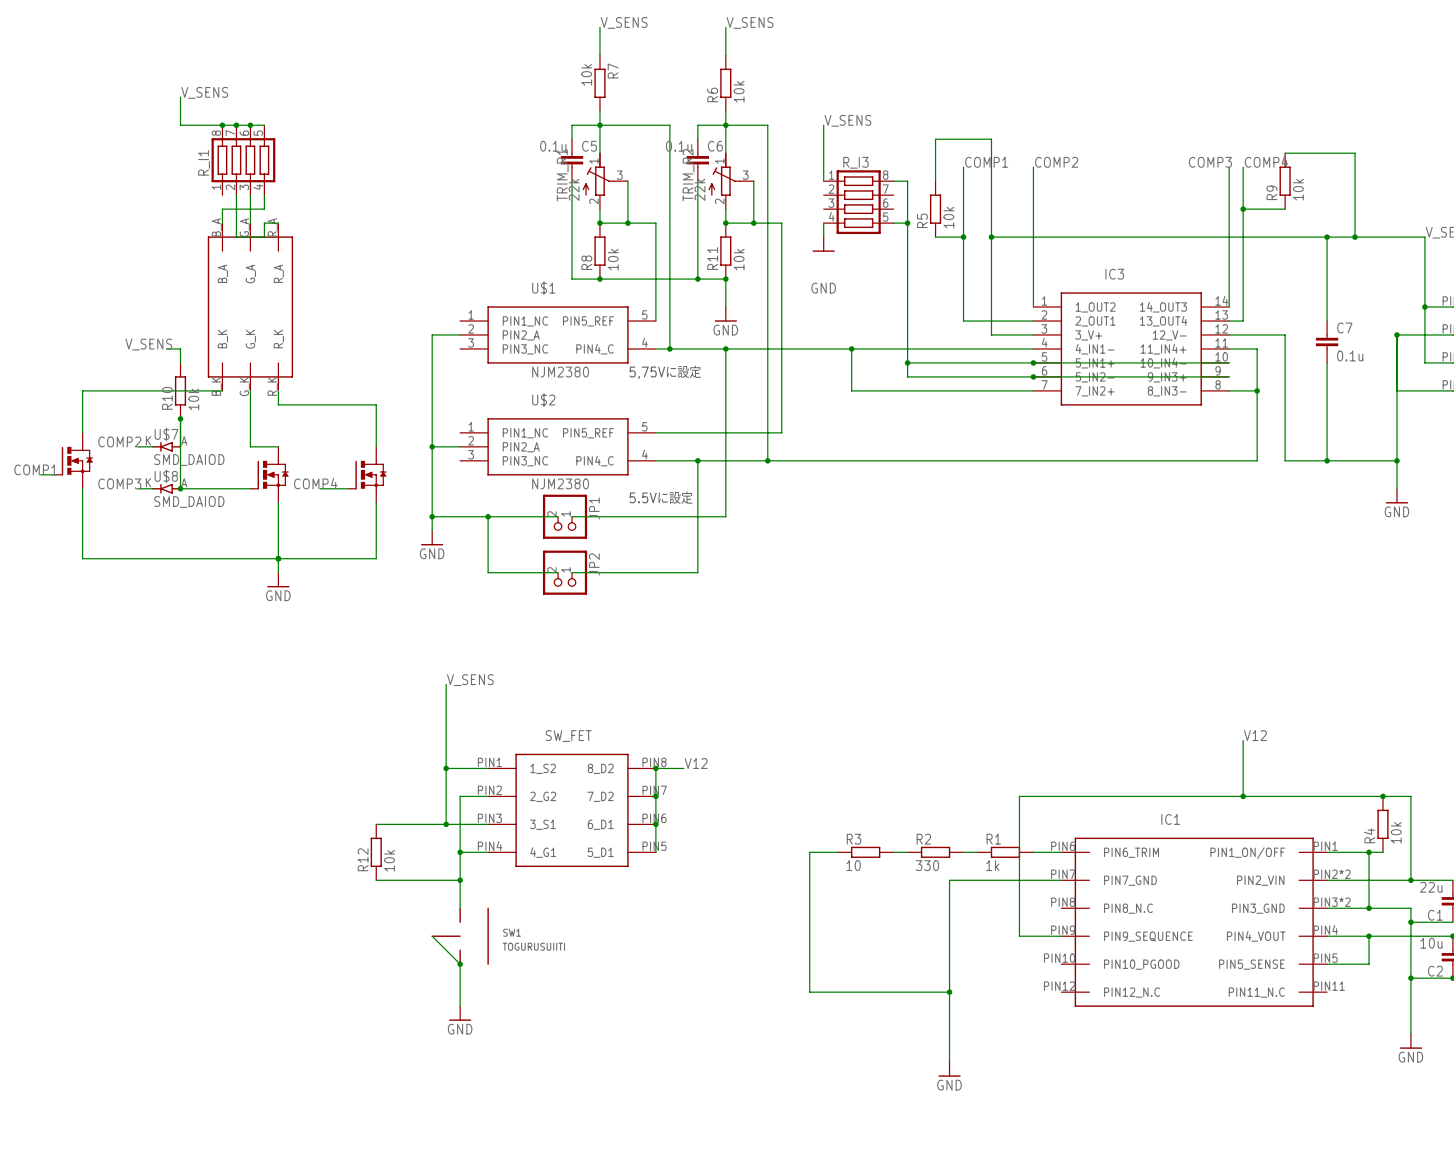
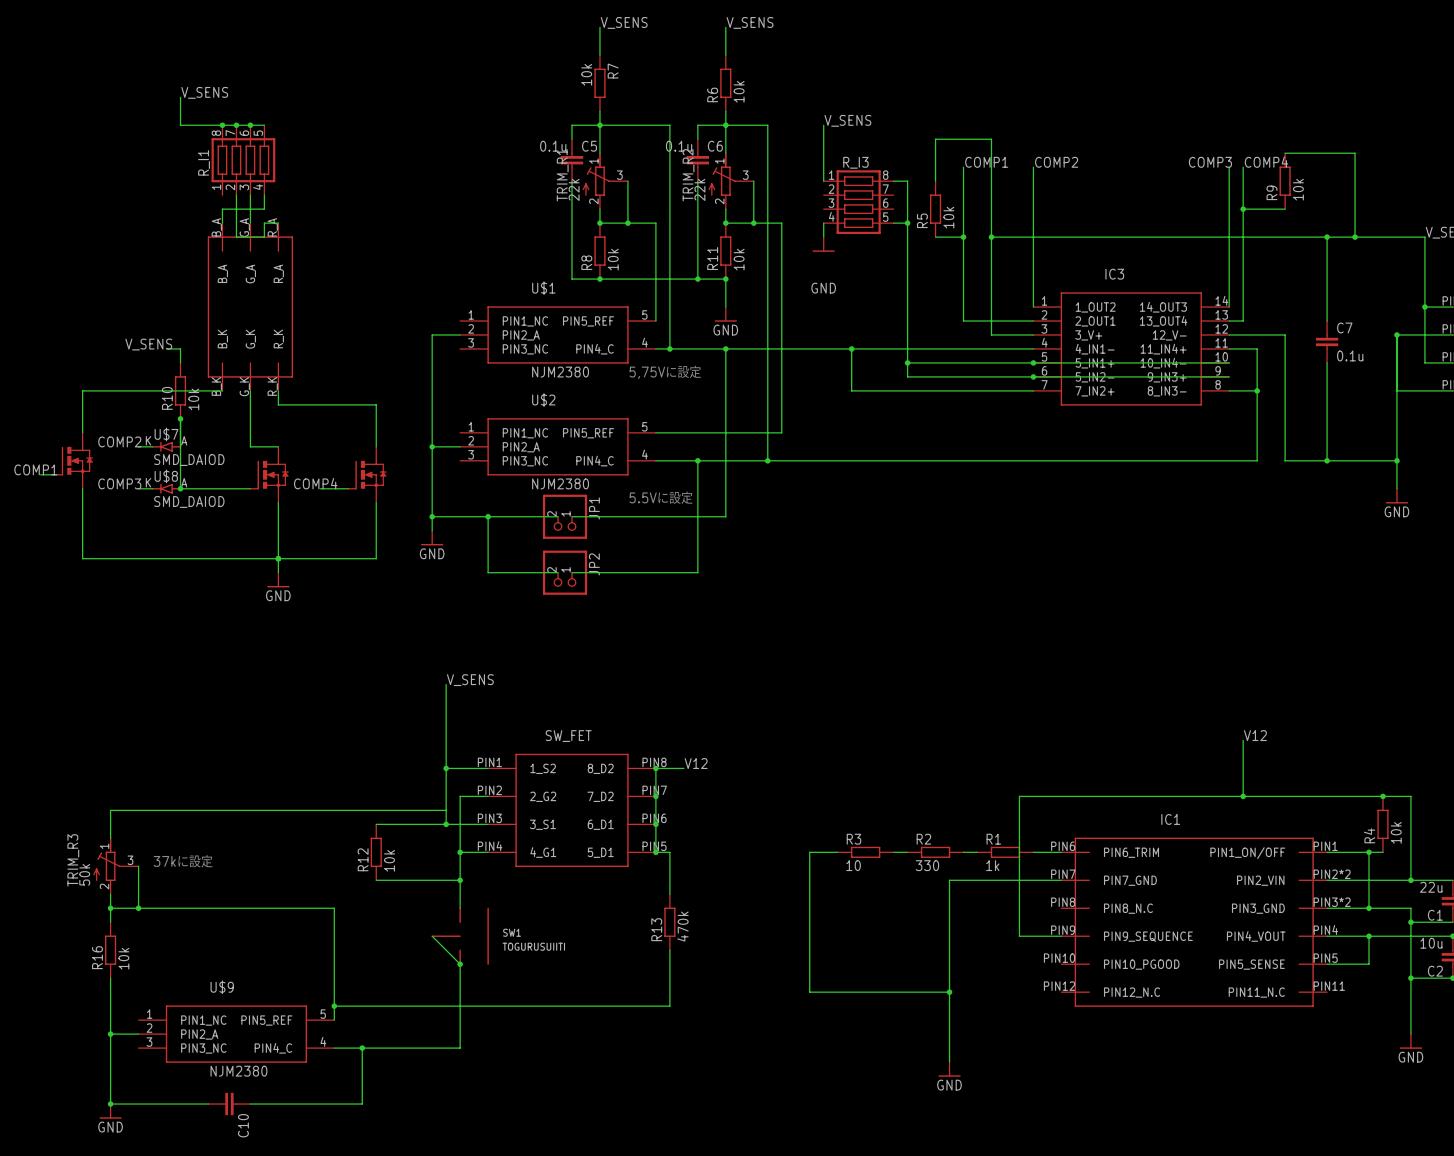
wire: none -> (446, 810) (110, 810) (110, 838)
wire: none -> (655, 852) (669, 852) (669, 894)
junction: none -> (655, 852)
text: none -> 37kに設定 (183, 861)
TRIM_R3: none -> 50k (115, 866)
wire: none -> (138, 866) (138, 908)
wire: none -> (110, 894) (110, 922)
wire: none -> (110, 908) (334, 908) (334, 1020)
junction: none -> (110, 908)
junction: none -> (138, 908)
R13: none -> 470k (669, 922)
R16: none -> 10k (110, 950)
wire: none -> (669, 950) (669, 1006) (334, 1006)
wire: none -> (110, 978) (110, 1104) (208, 1104)
junction: none -> (334, 1006)
wire: none -> (460, 1006) (460, 1048) (334, 1048)
power symbol: GND (460, 1013) -> none
wire: none -> (110, 1034) (138, 1034)
junction: none -> (110, 1034)
U$9: none -> NJM2380 (236, 1034)
wire: none -> (362, 1048) (362, 1104) (250, 1104)
junction: none -> (362, 1048)
junction: none -> (110, 1104)
C10: none -> (229, 1104)
power symbol: none -> GND (110, 1111)

